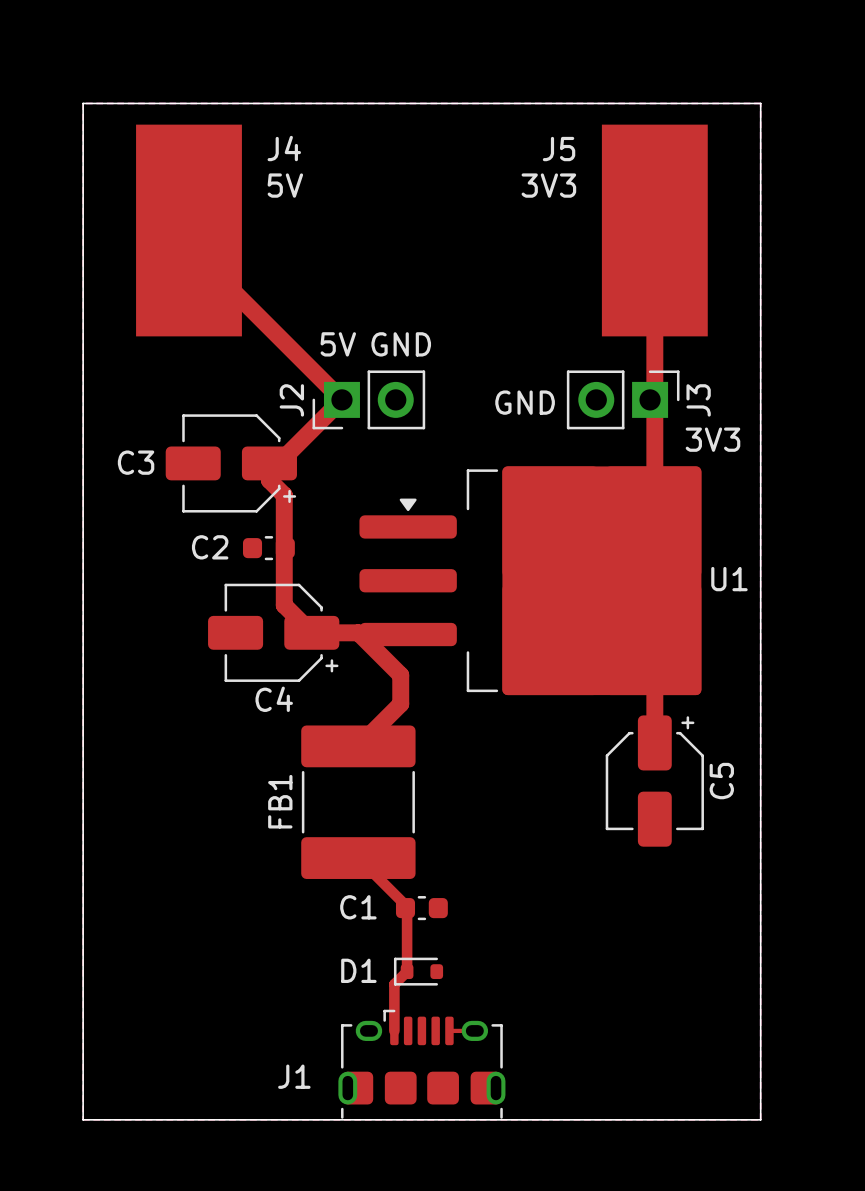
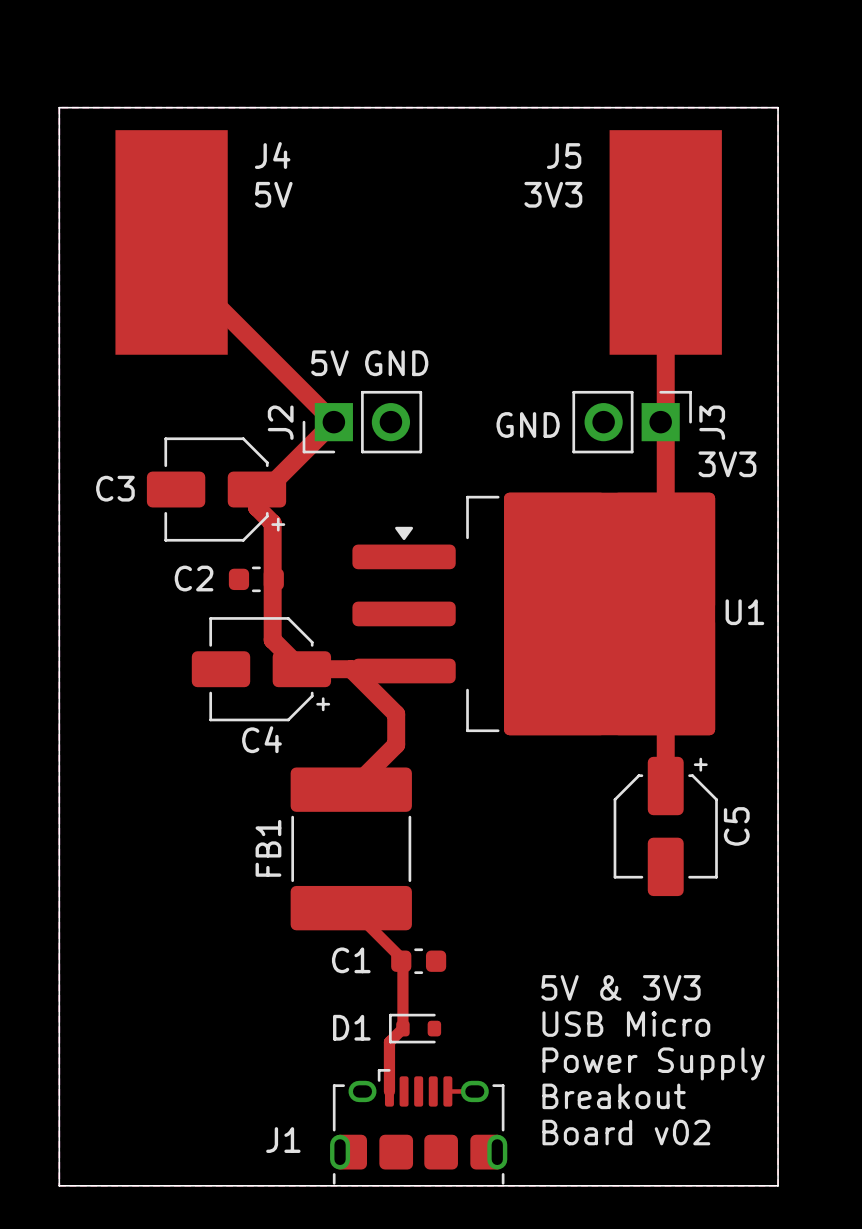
text: none -> 5V & 3V3 (621, 987)
text: none -> USB Micro (626, 1024)
text: none -> Power Supply (653, 1063)
text: none -> Breakout (614, 1096)
text: none -> Board v02 (626, 1132)

